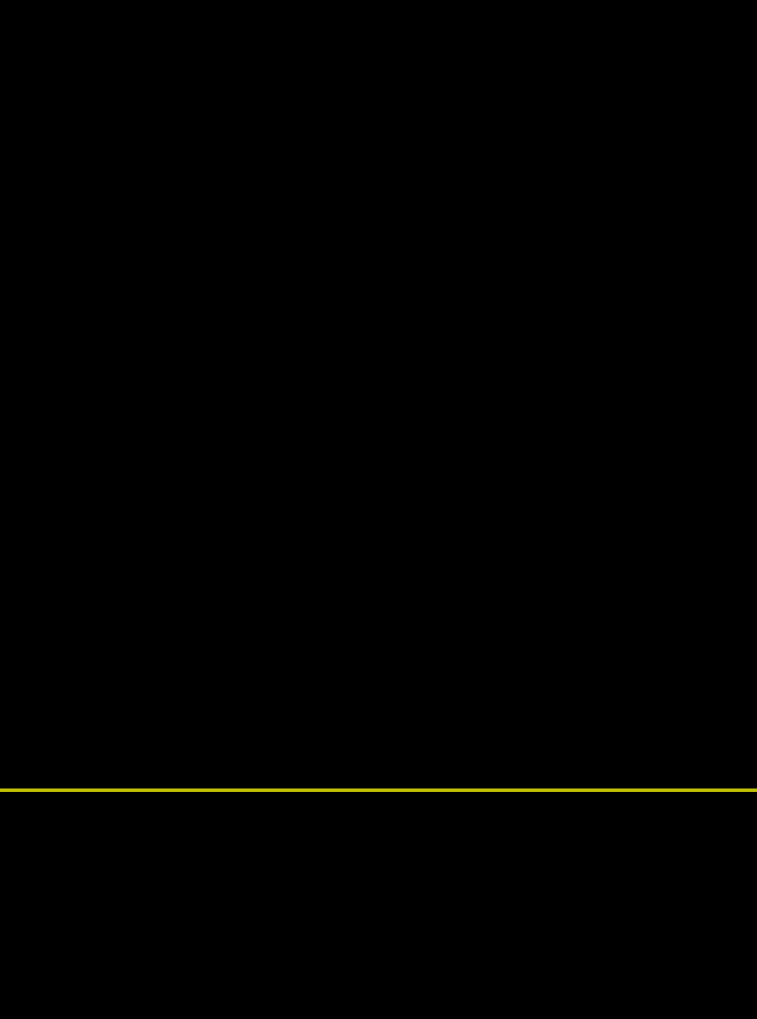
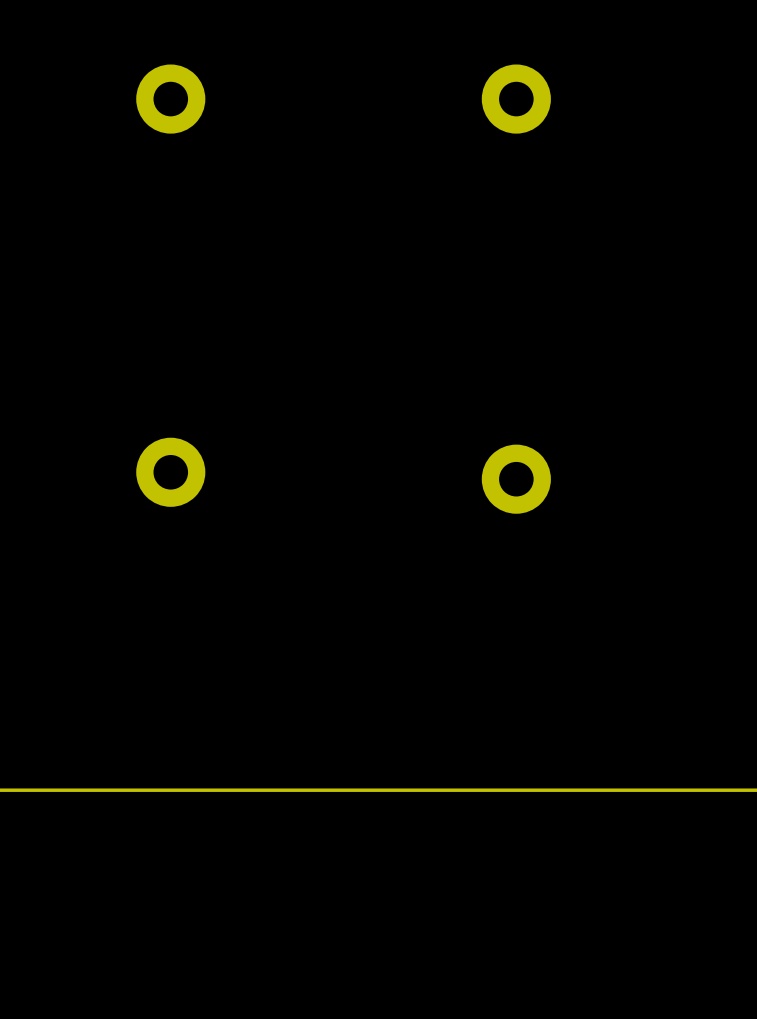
part: none -> (170, 99)
part: none -> (516, 99)
part: none -> (170, 472)
part: none -> (516, 479)

